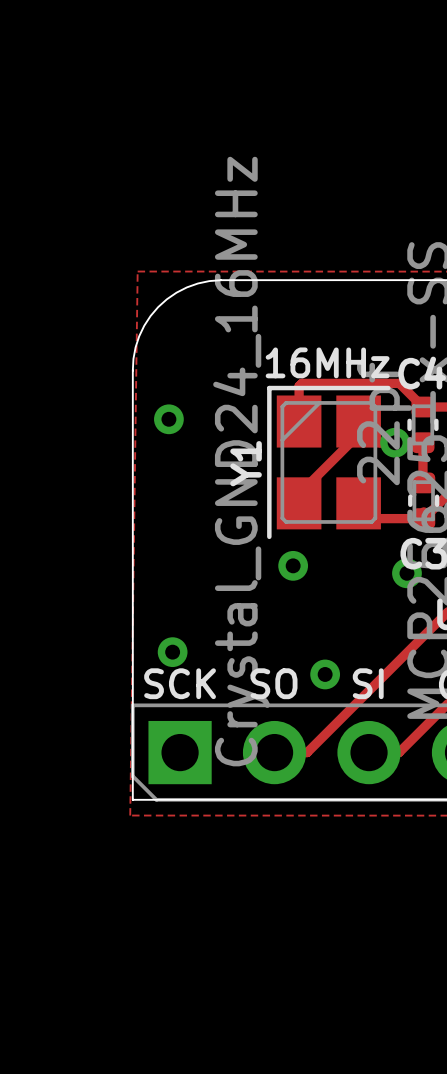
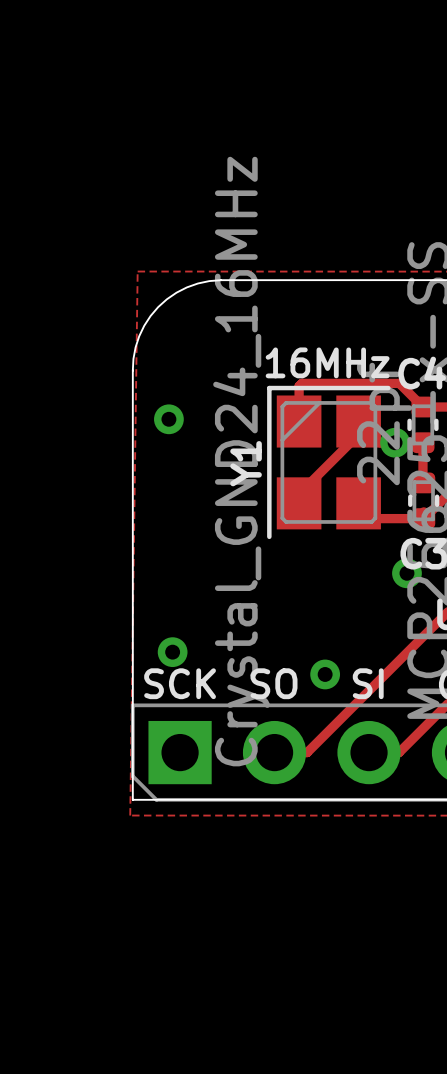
via: (293, 565) -> none

